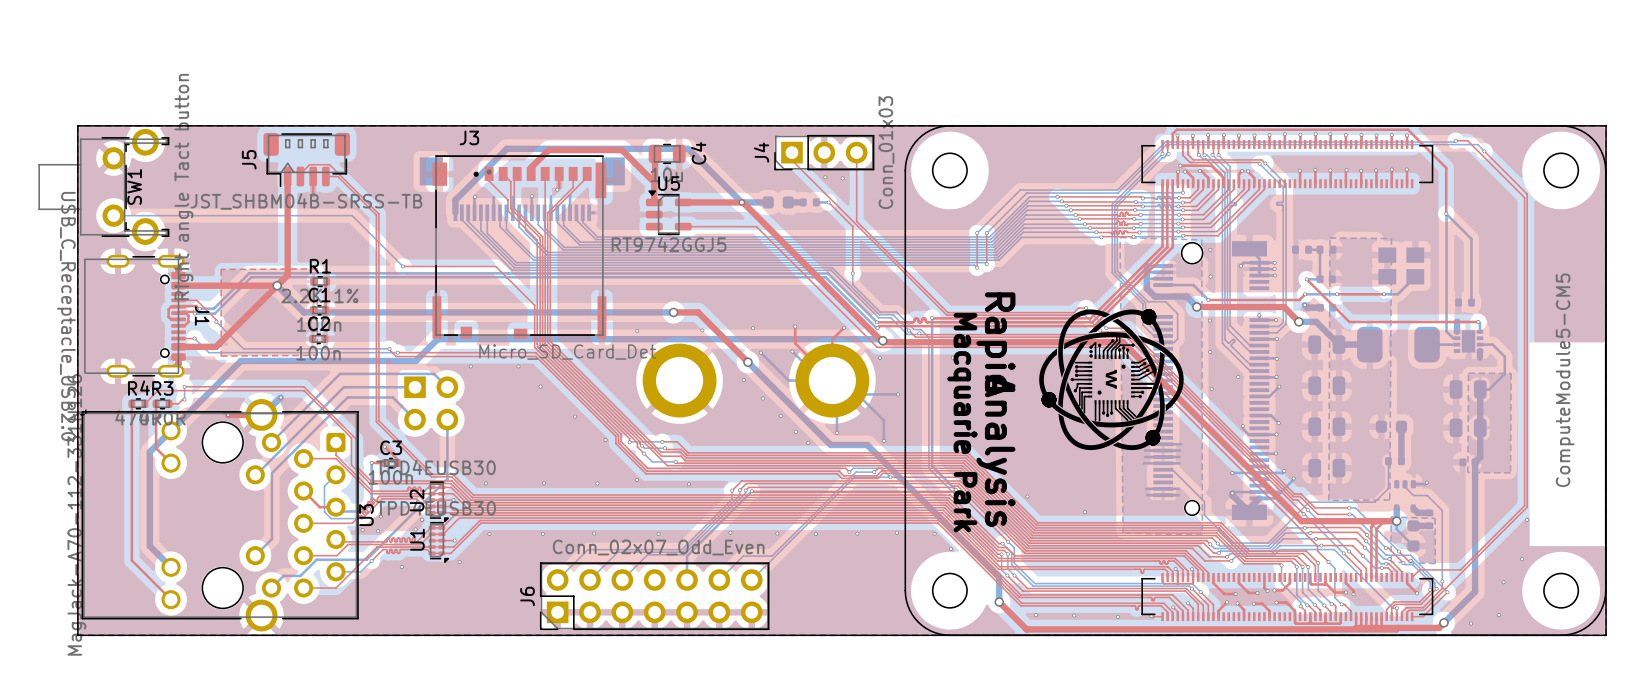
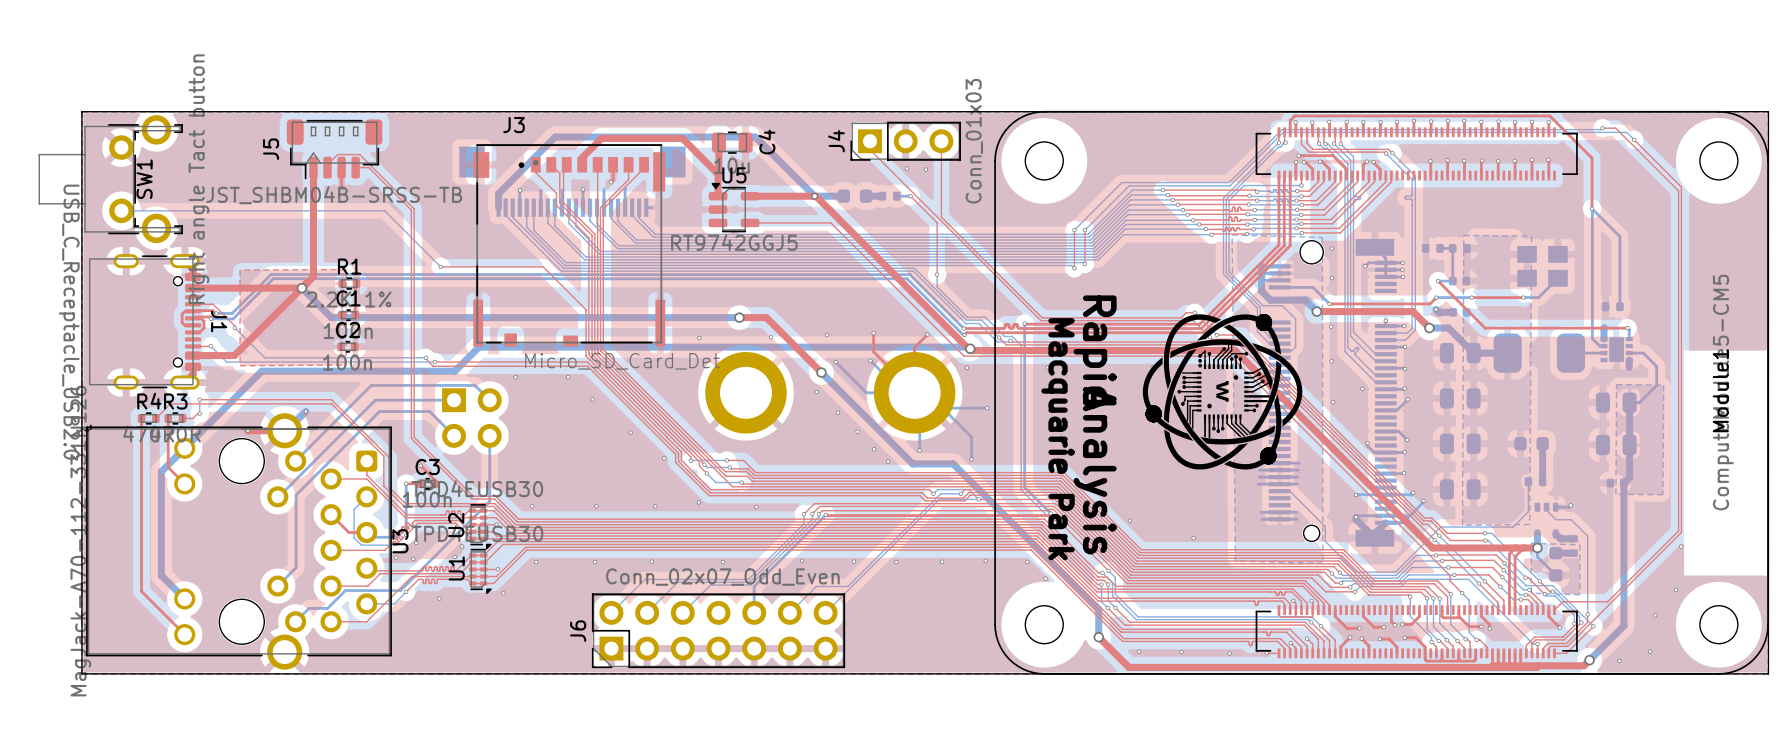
Module1 name: none -> Module1 (1720, 390)

